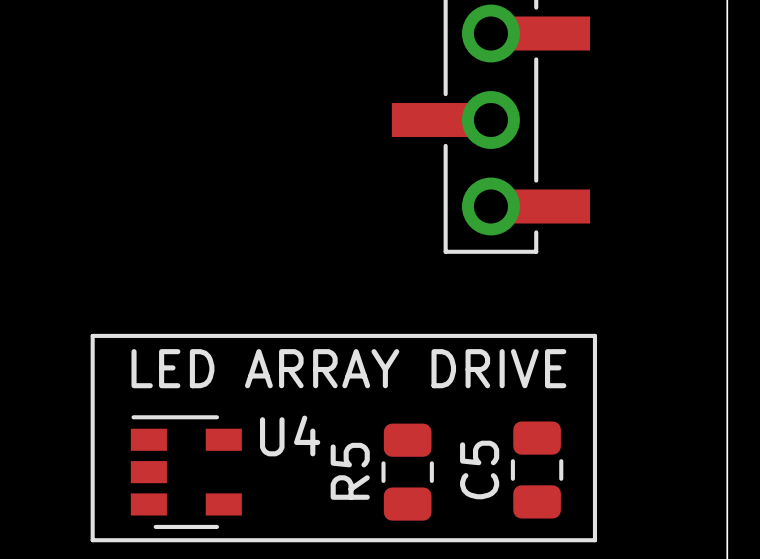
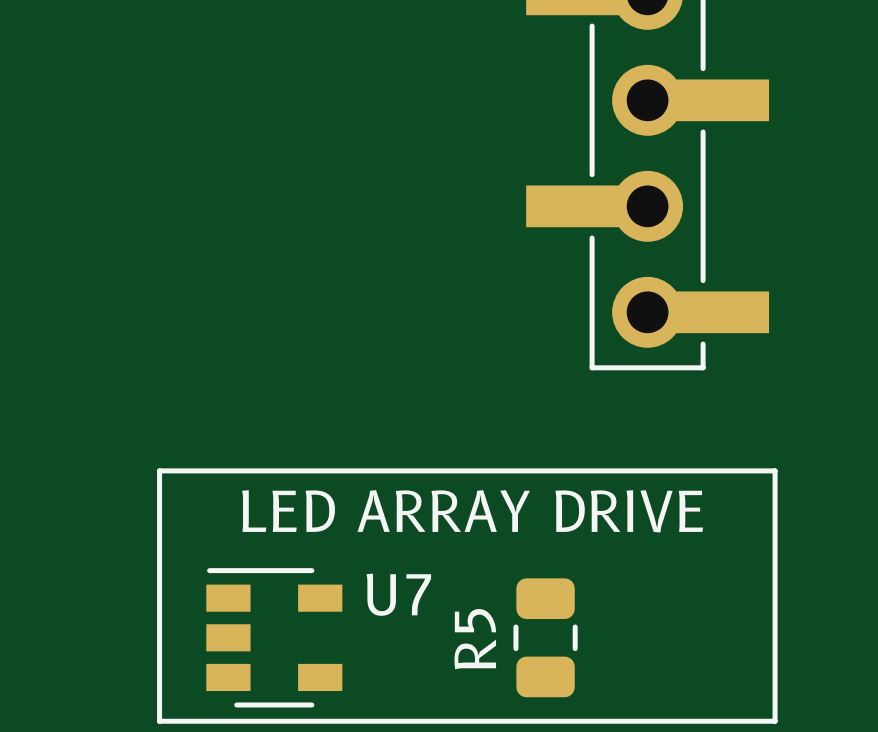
U4 name: U4 (290, 435) -> U7 (398, 594)
C5: (537, 469) -> none

